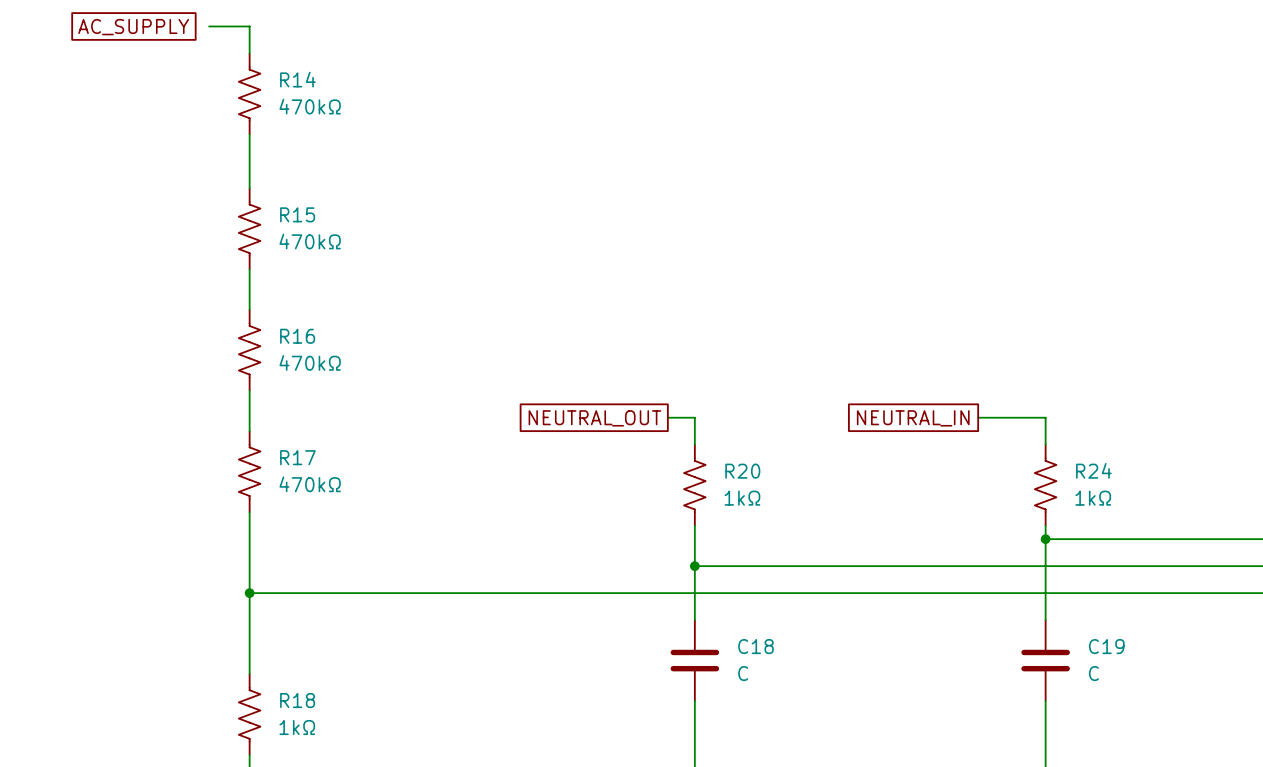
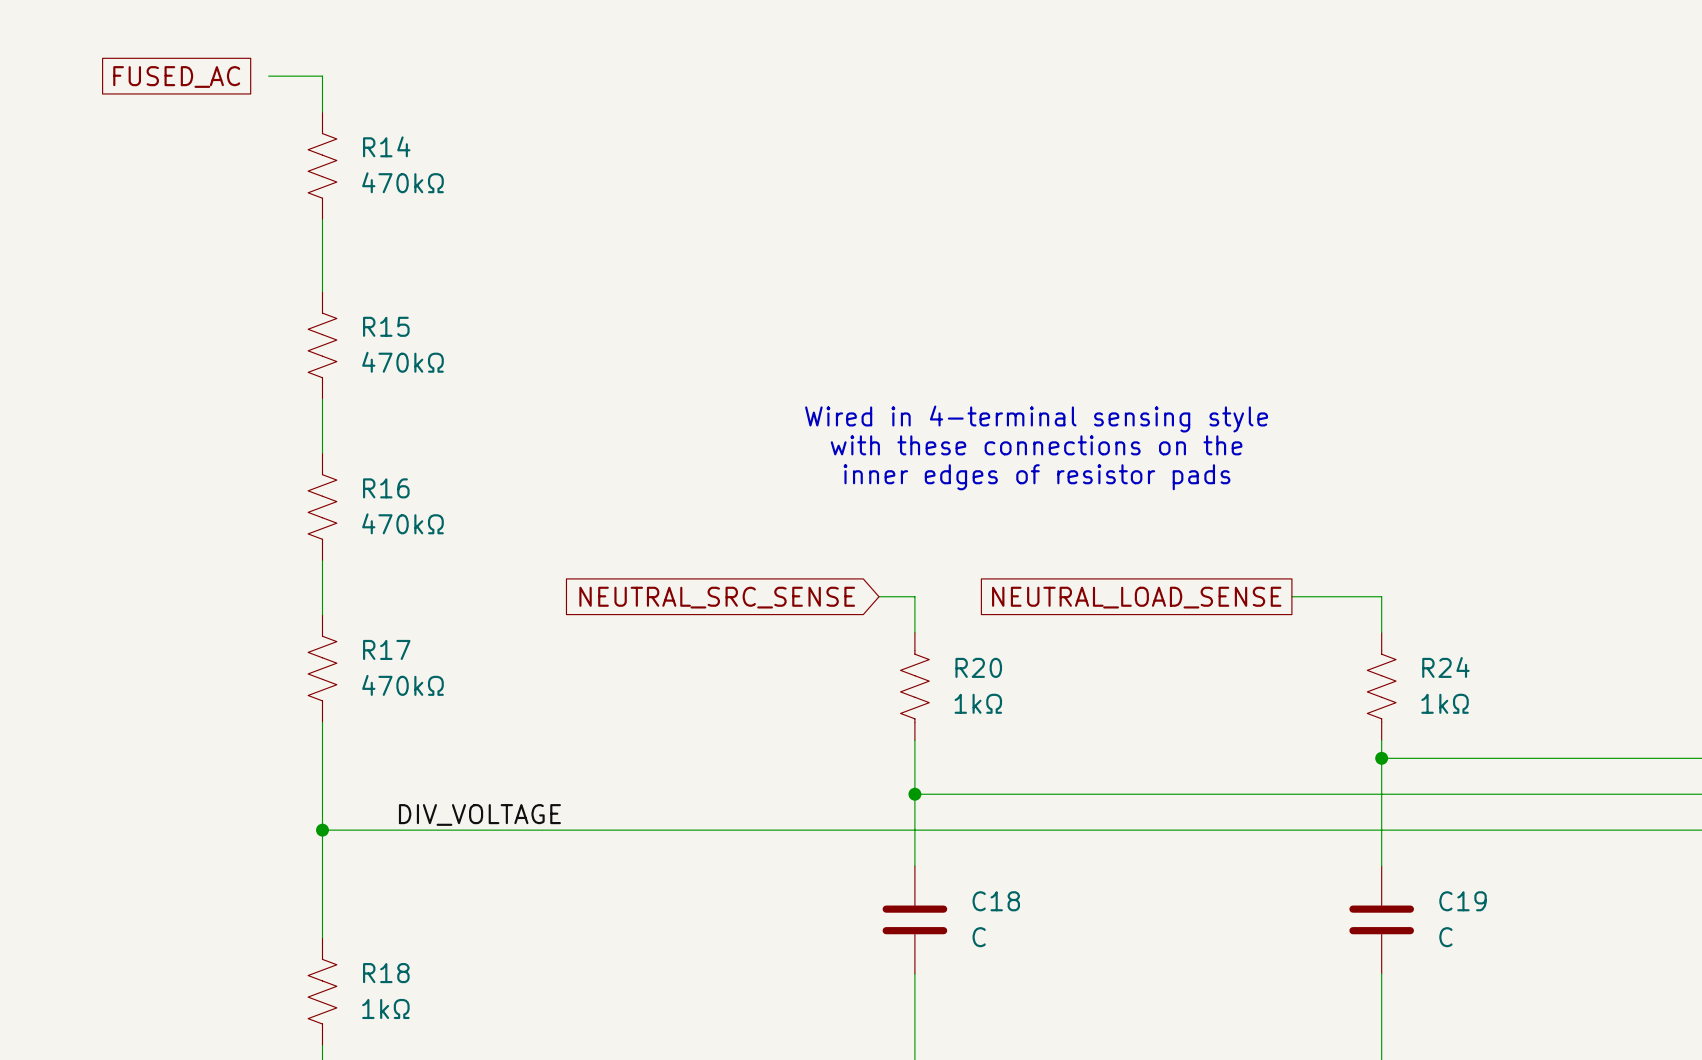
global label: AC_SUPPLY (133, 27) -> FUSED_AC (176, 76)
text: none -> Wired in 4-terminal sensing style (1036, 419)
text: none -> with these connections on the (1036, 445)
text: none -> inner edges of resistor pads (1036, 477)
global label shape: passive (594, 418) -> input (717, 597)
global label: NEUTRAL_OUT (594, 418) -> NEUTRAL_SRC_SENSE (717, 597)
global label: NEUTRAL_IN (913, 418) -> NEUTRAL_LOAD_SENSE (1136, 597)
label: none -> DIV_VOLTAGE (479, 814)

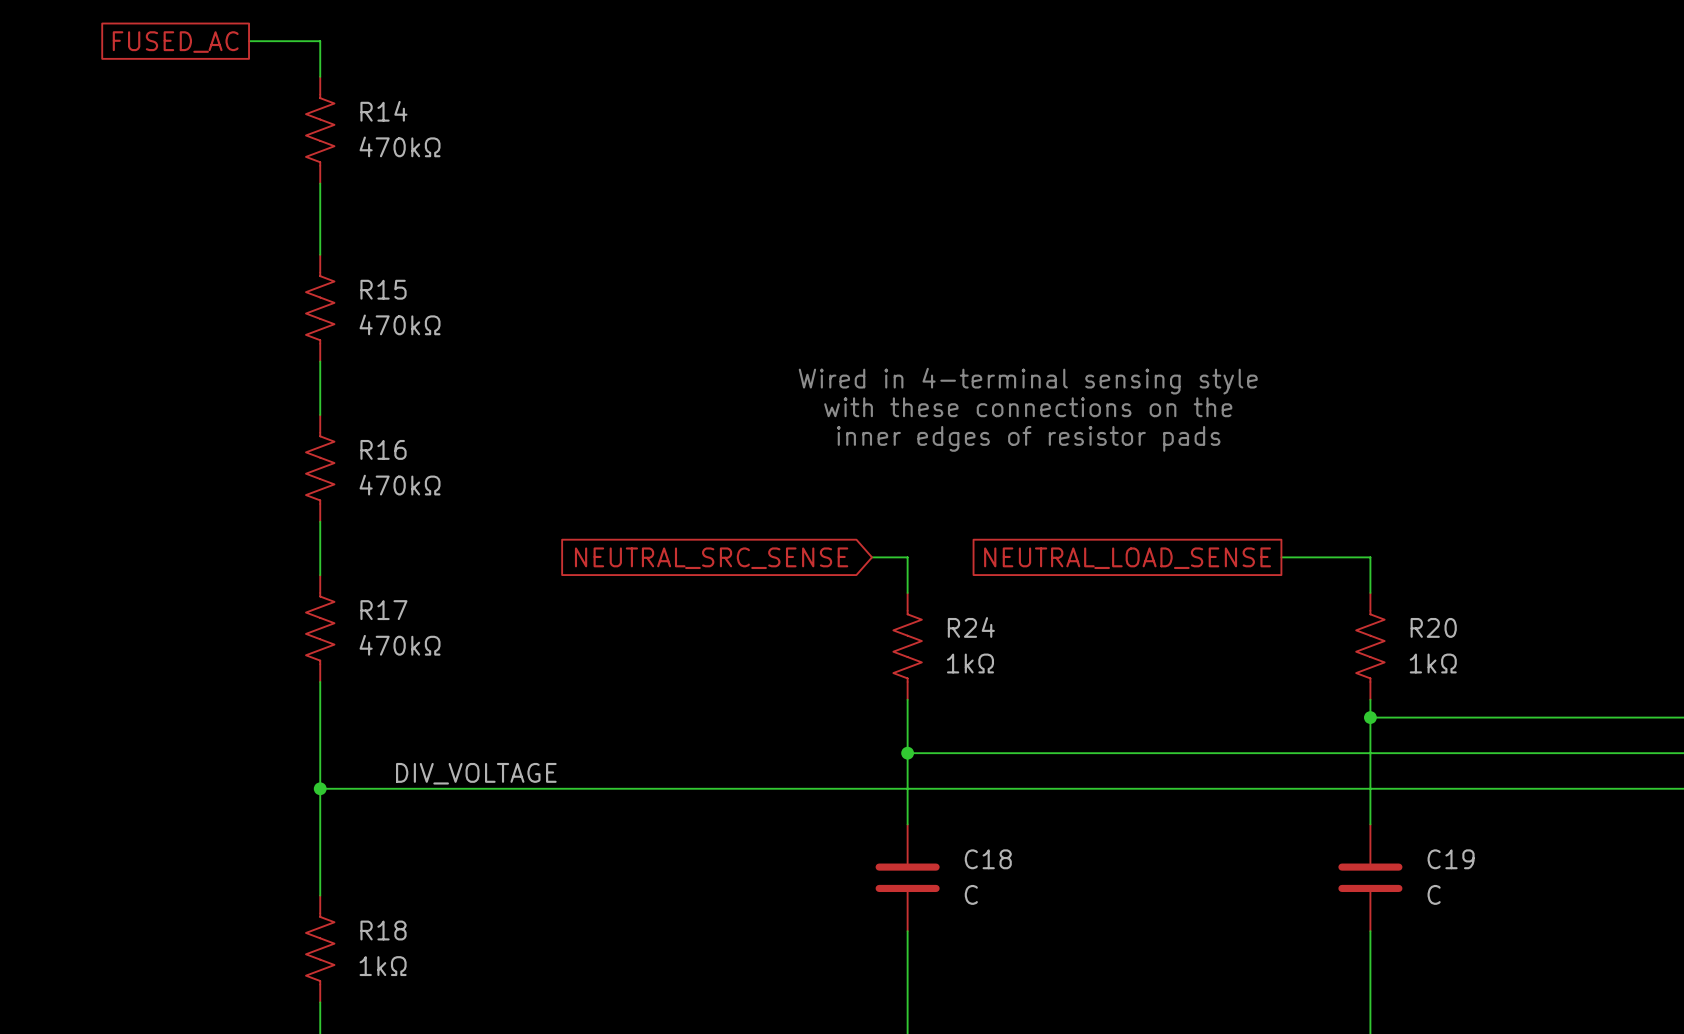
wire: none -> (249, 41) (266, 41)
R20 name: R20 (978, 667) -> R24 (971, 627)
R24 name: R24 (1445, 667) -> R20 (1433, 627)

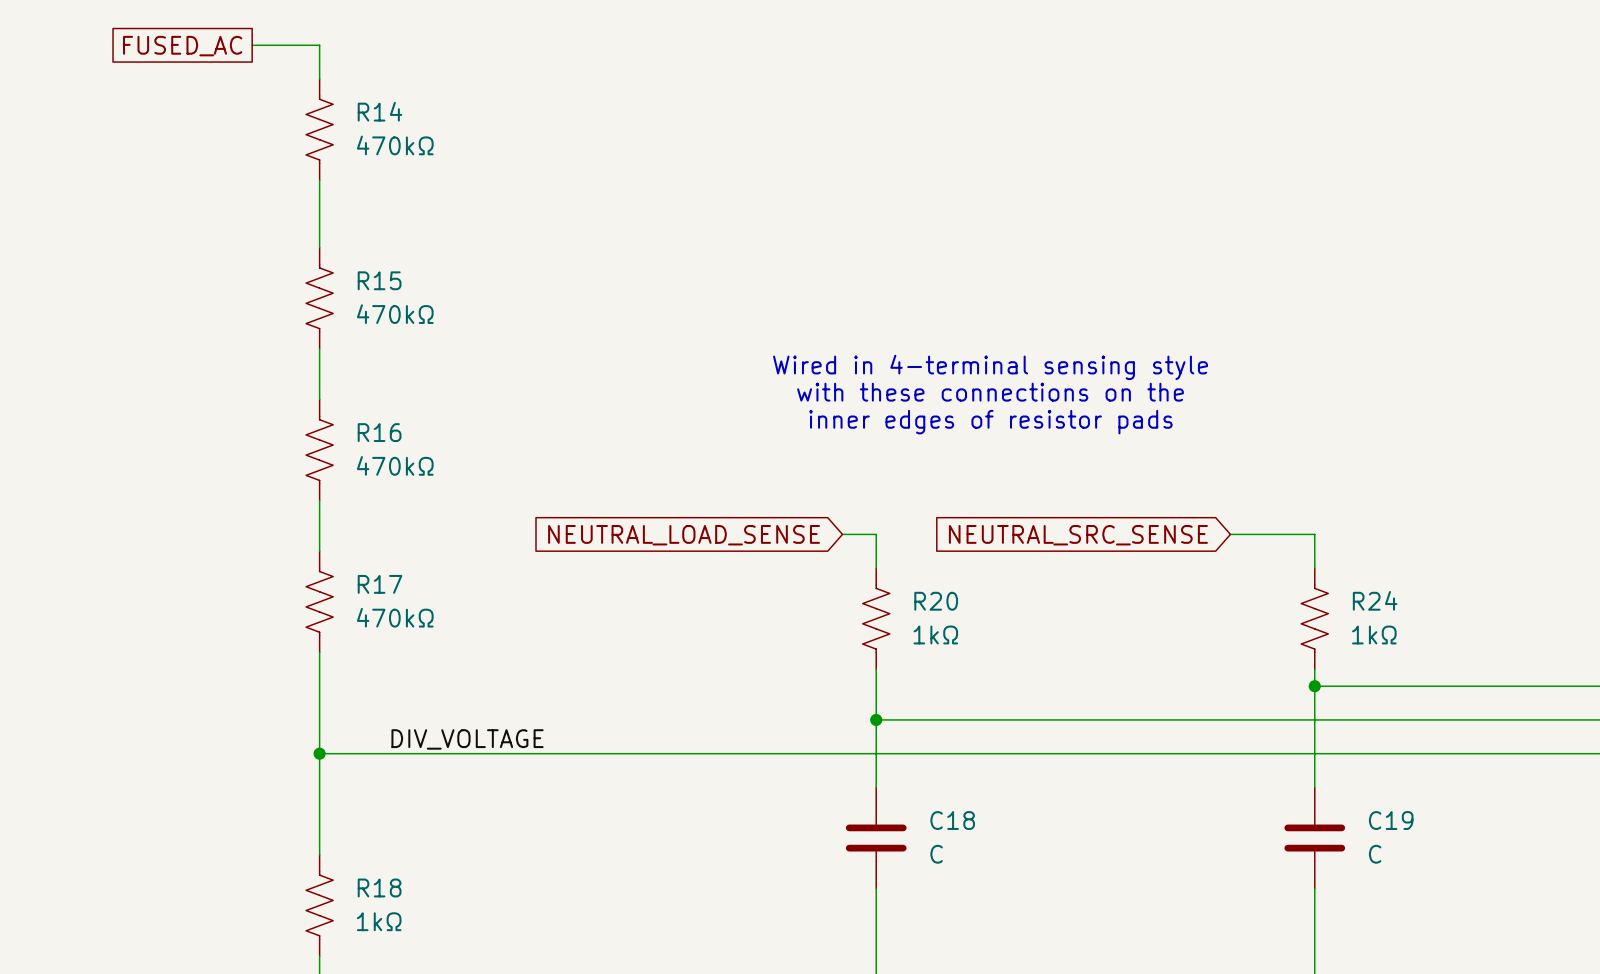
global label: NEUTRAL_SRC_SENSE (711, 558) -> NEUTRAL_LOAD_SENSE (684, 535)
global label shape: passive (1127, 558) -> input (1078, 535)
global label: NEUTRAL_LOAD_SENSE (1127, 558) -> NEUTRAL_SRC_SENSE (1078, 535)
R24 name: R24 (971, 627) -> R20 (936, 601)
R20 name: R20 (1433, 627) -> R24 (1375, 600)

